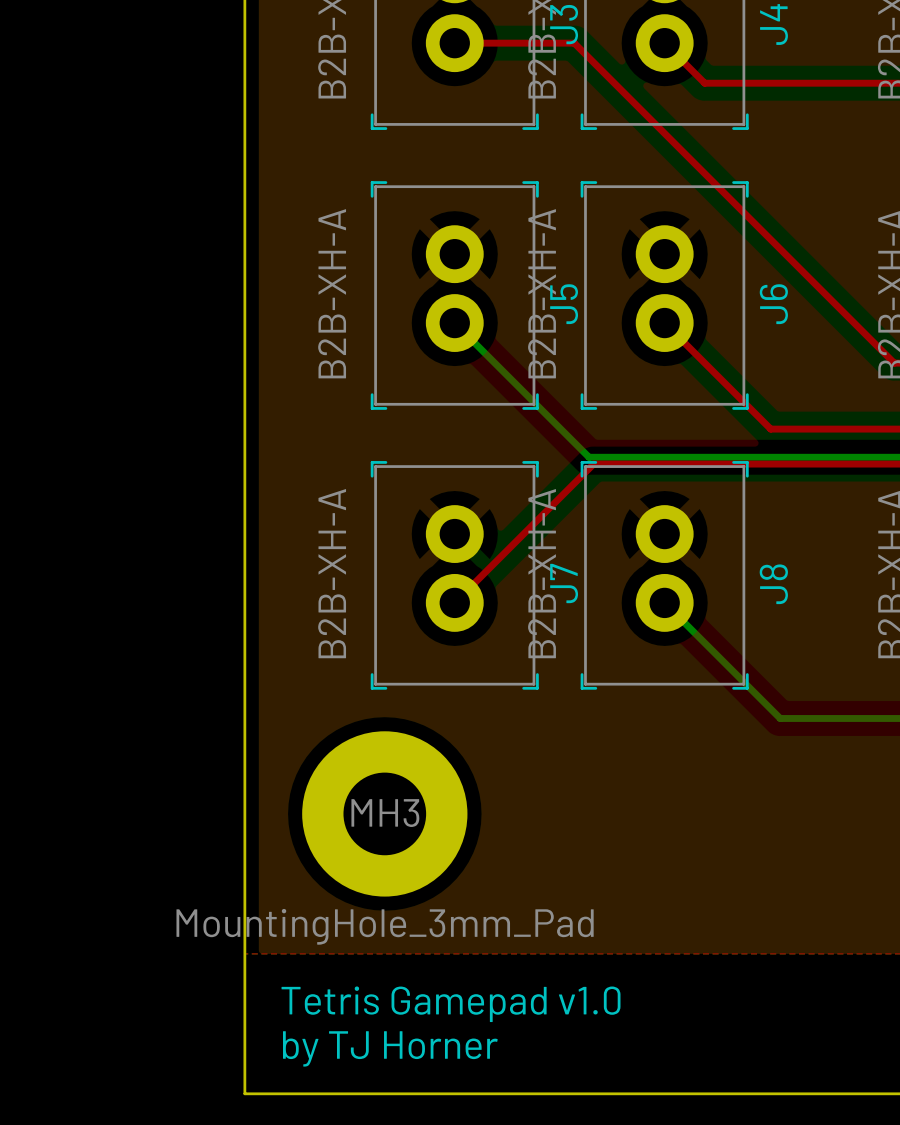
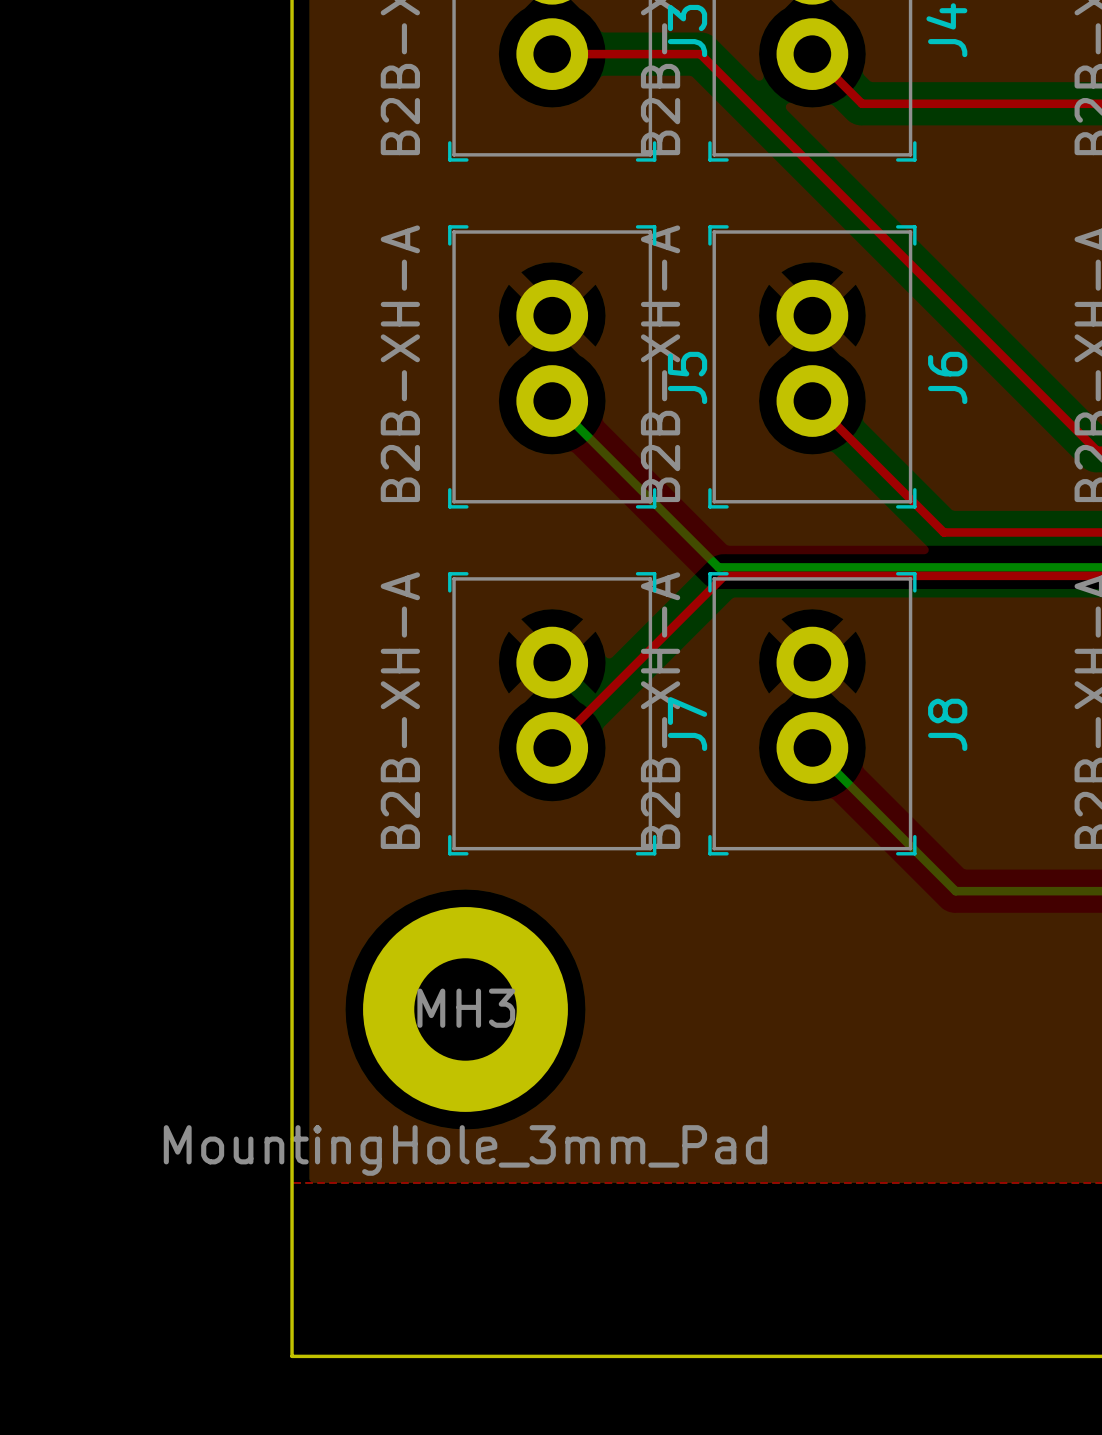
text: Tetris Gamepad v1.0 (451, 1004) -> none
text: by TJ Horner (390, 1048) -> none

